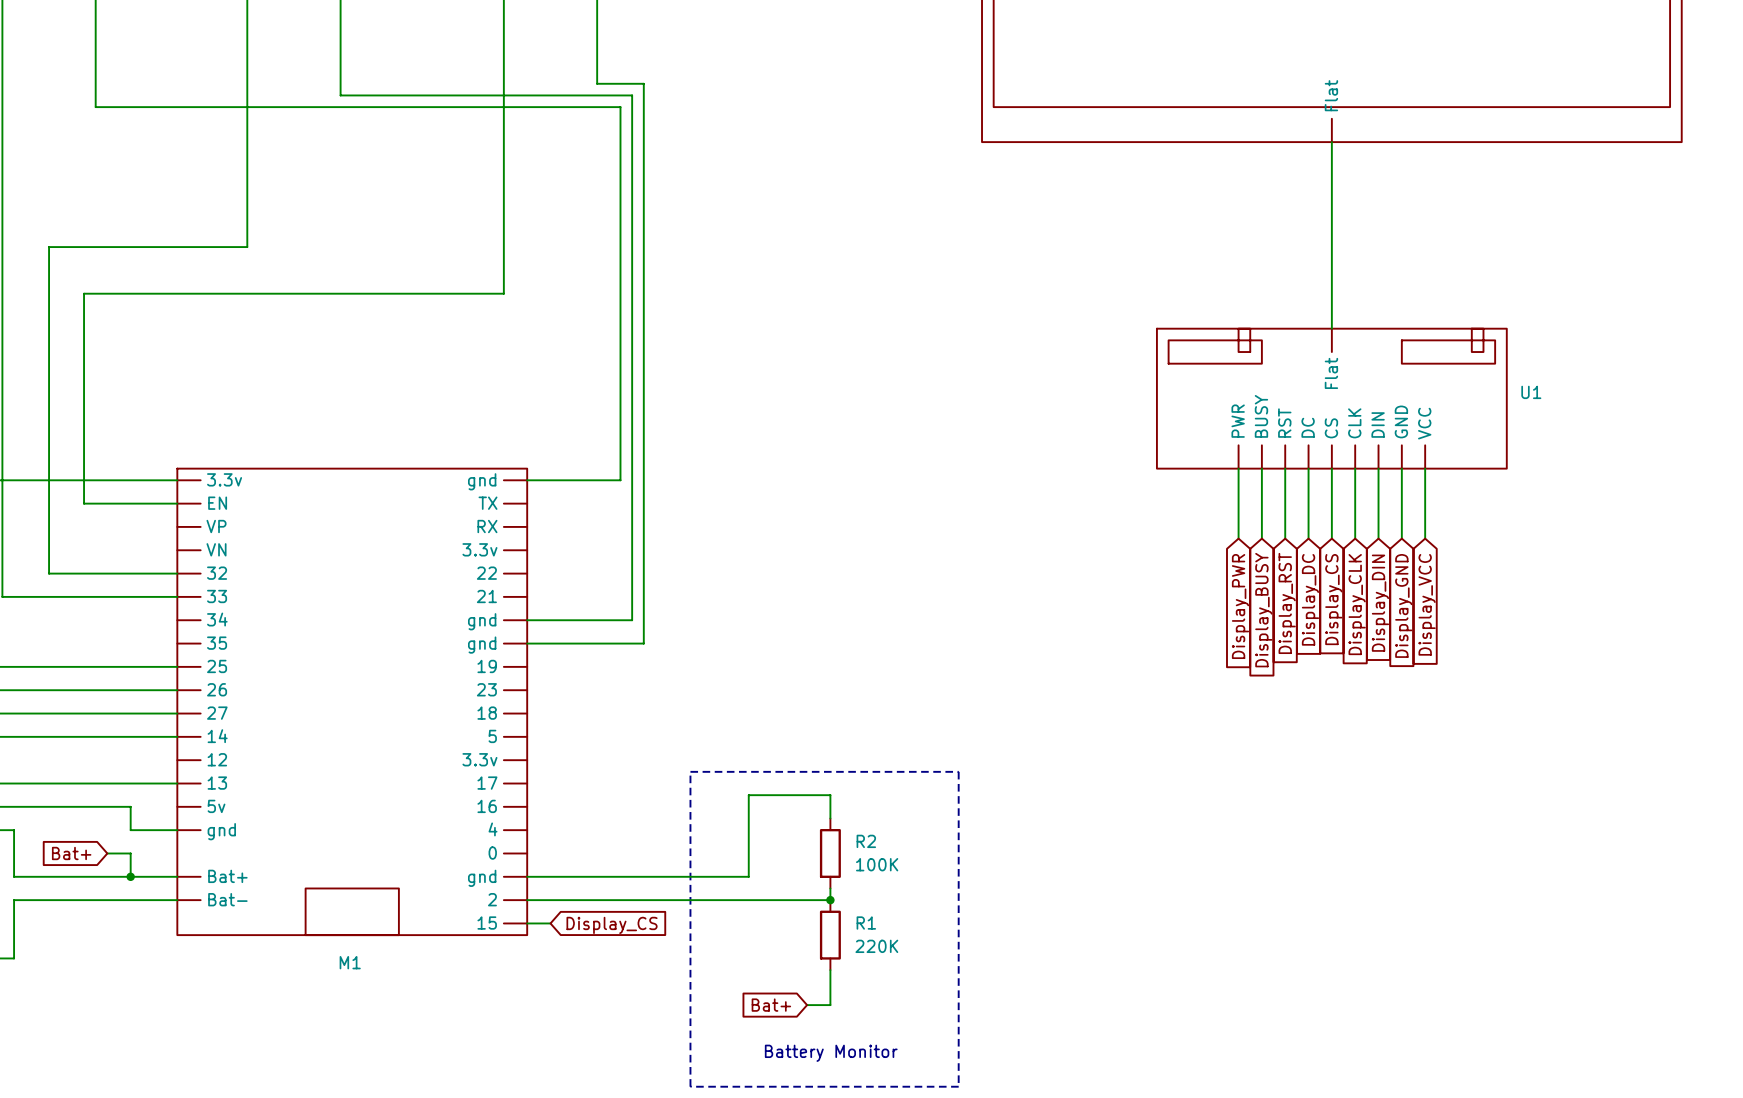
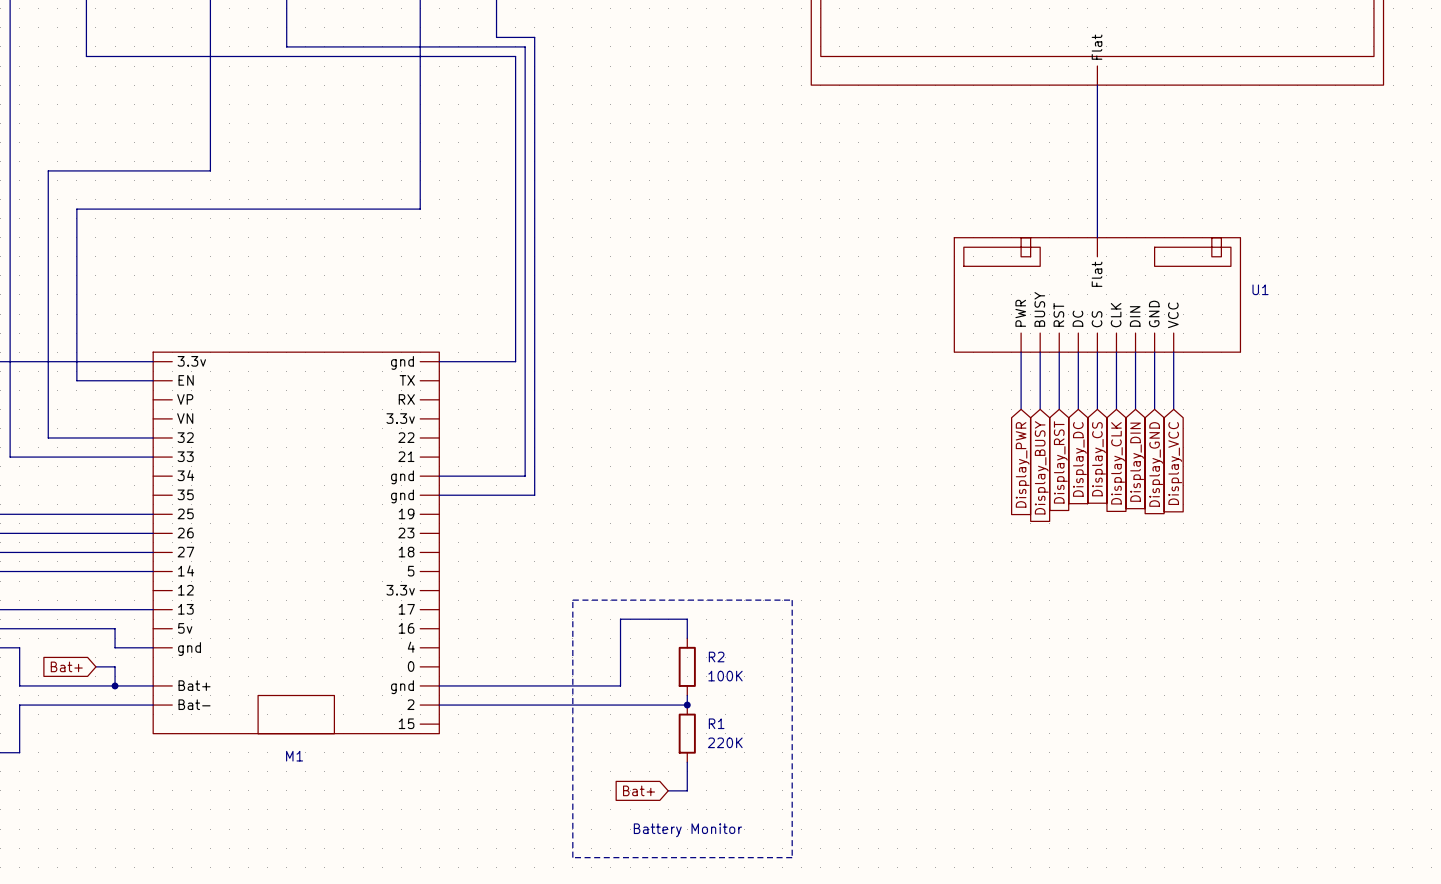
wire: (527, 923) (550, 923) -> none
global label: Display_CS (612, 925) -> none

